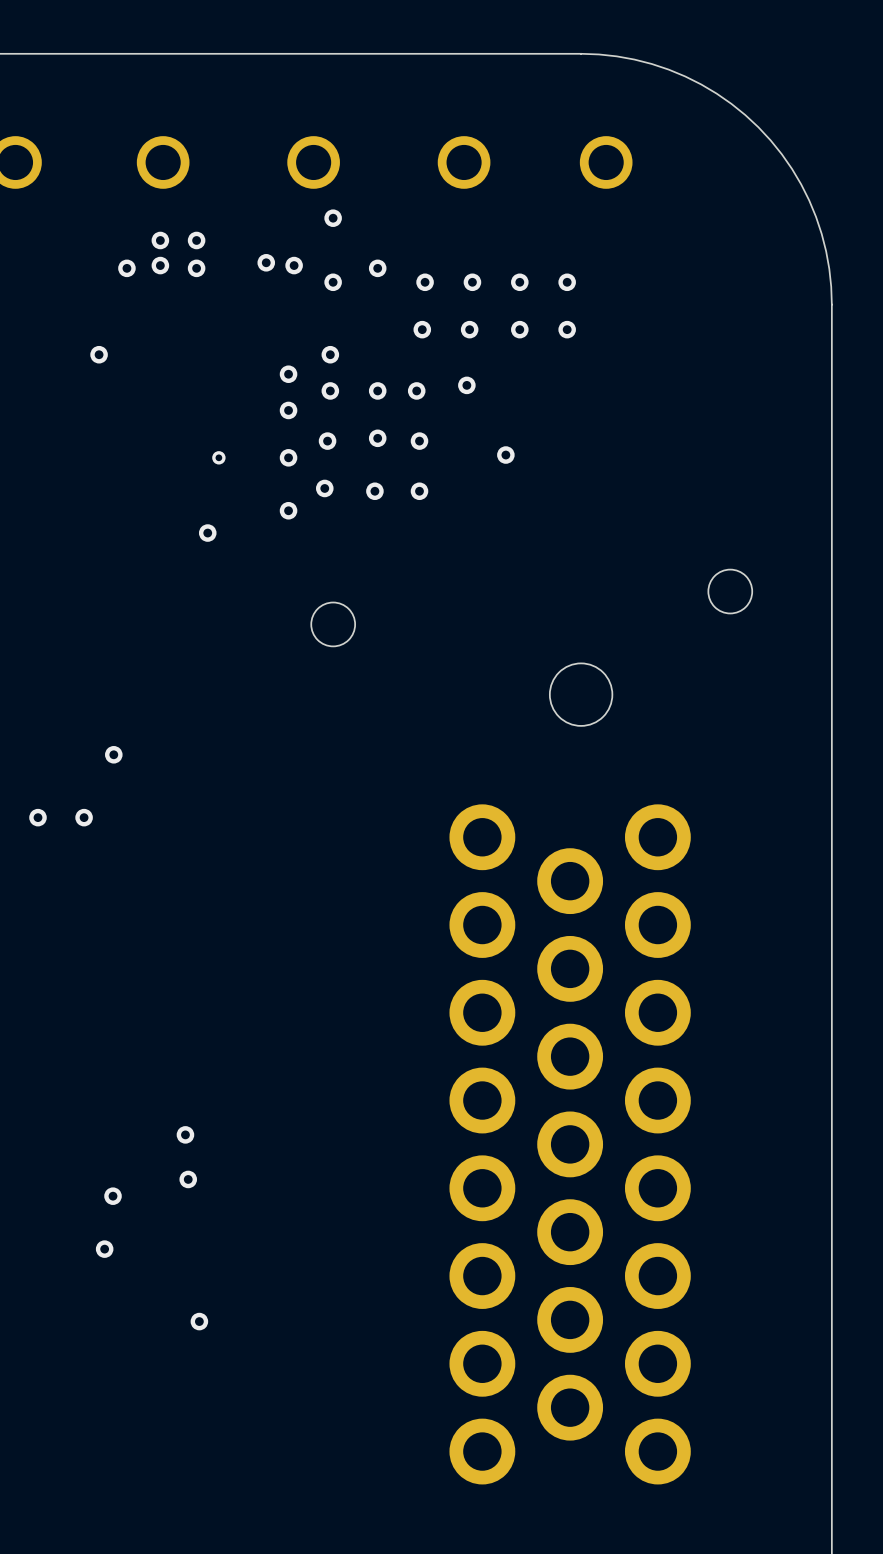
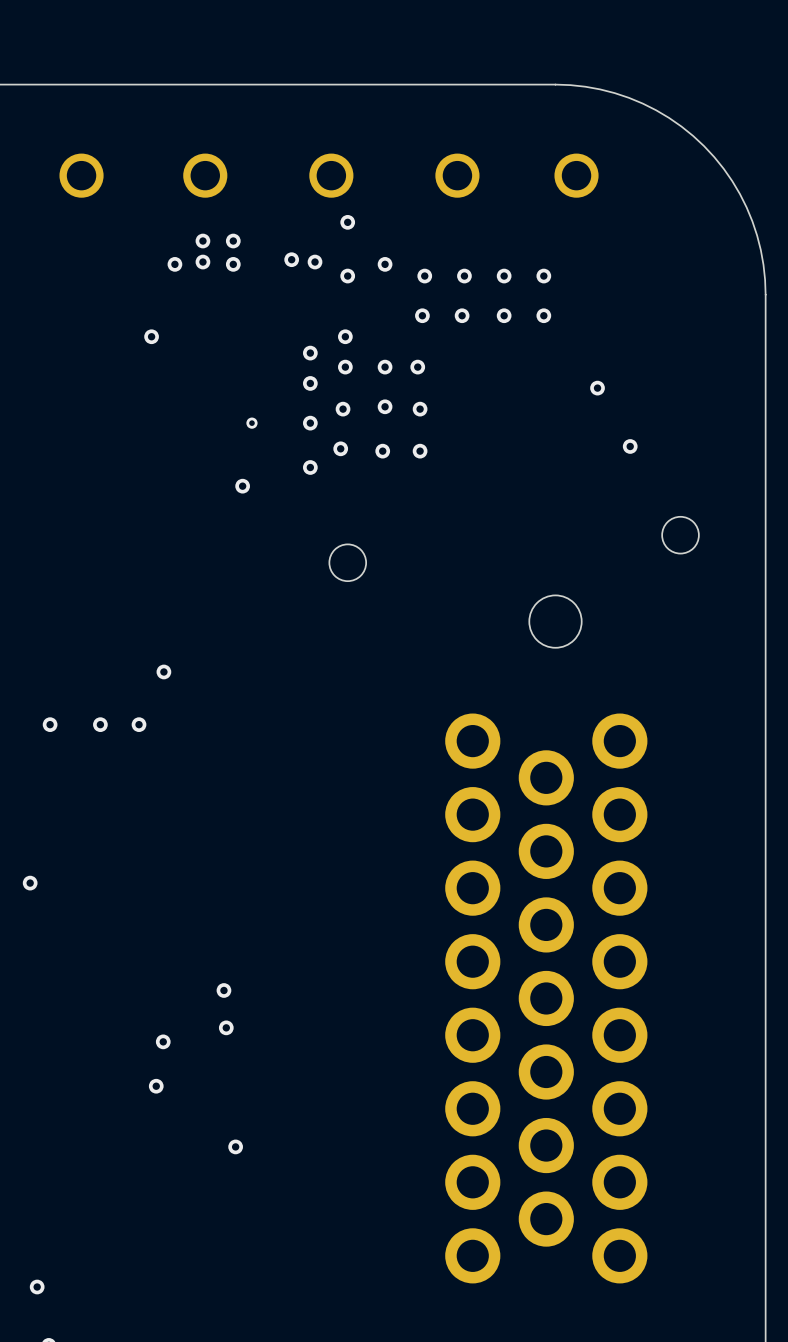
via: (466, 385) -> none
via: none -> (597, 388)
via: (505, 455) -> none
via: none -> (630, 446)

